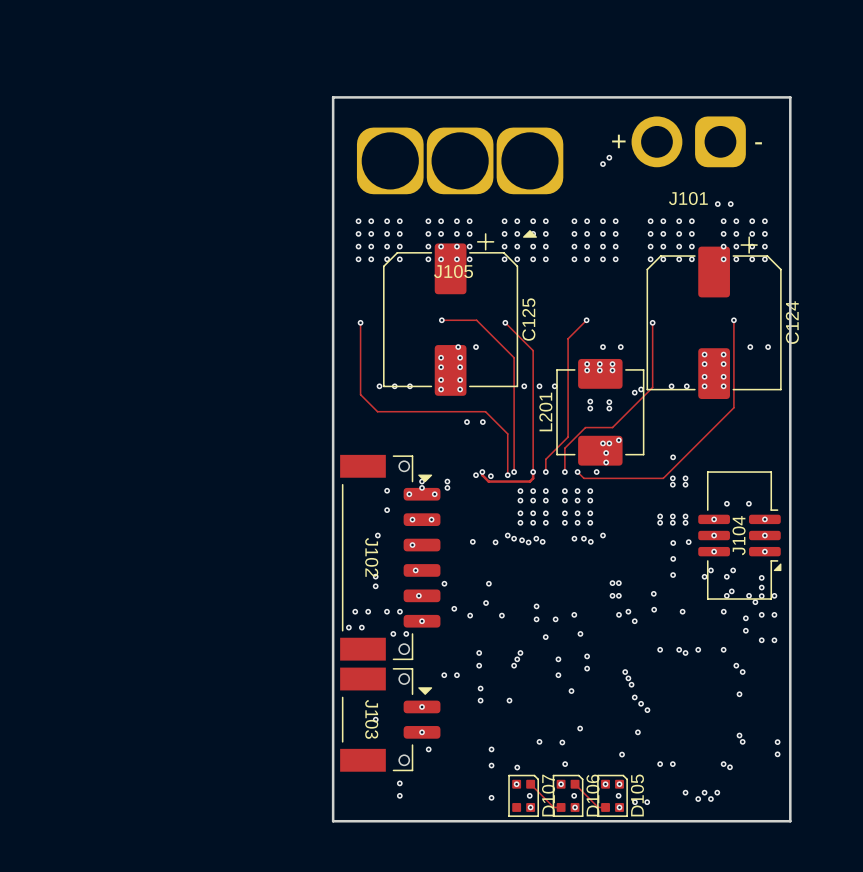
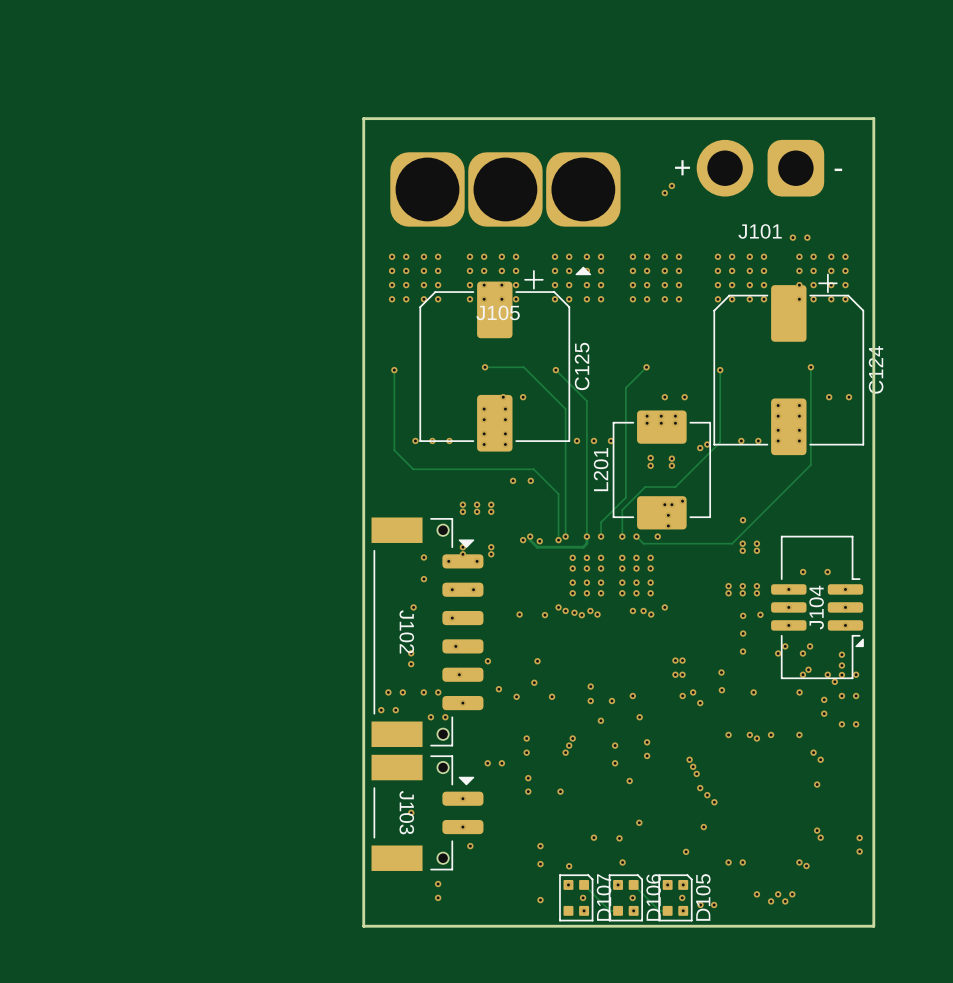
via: none -> (462, 504)
via: none -> (477, 504)
via: none -> (491, 504)
via: none -> (462, 511)
via: none -> (477, 511)
via: none -> (491, 511)

